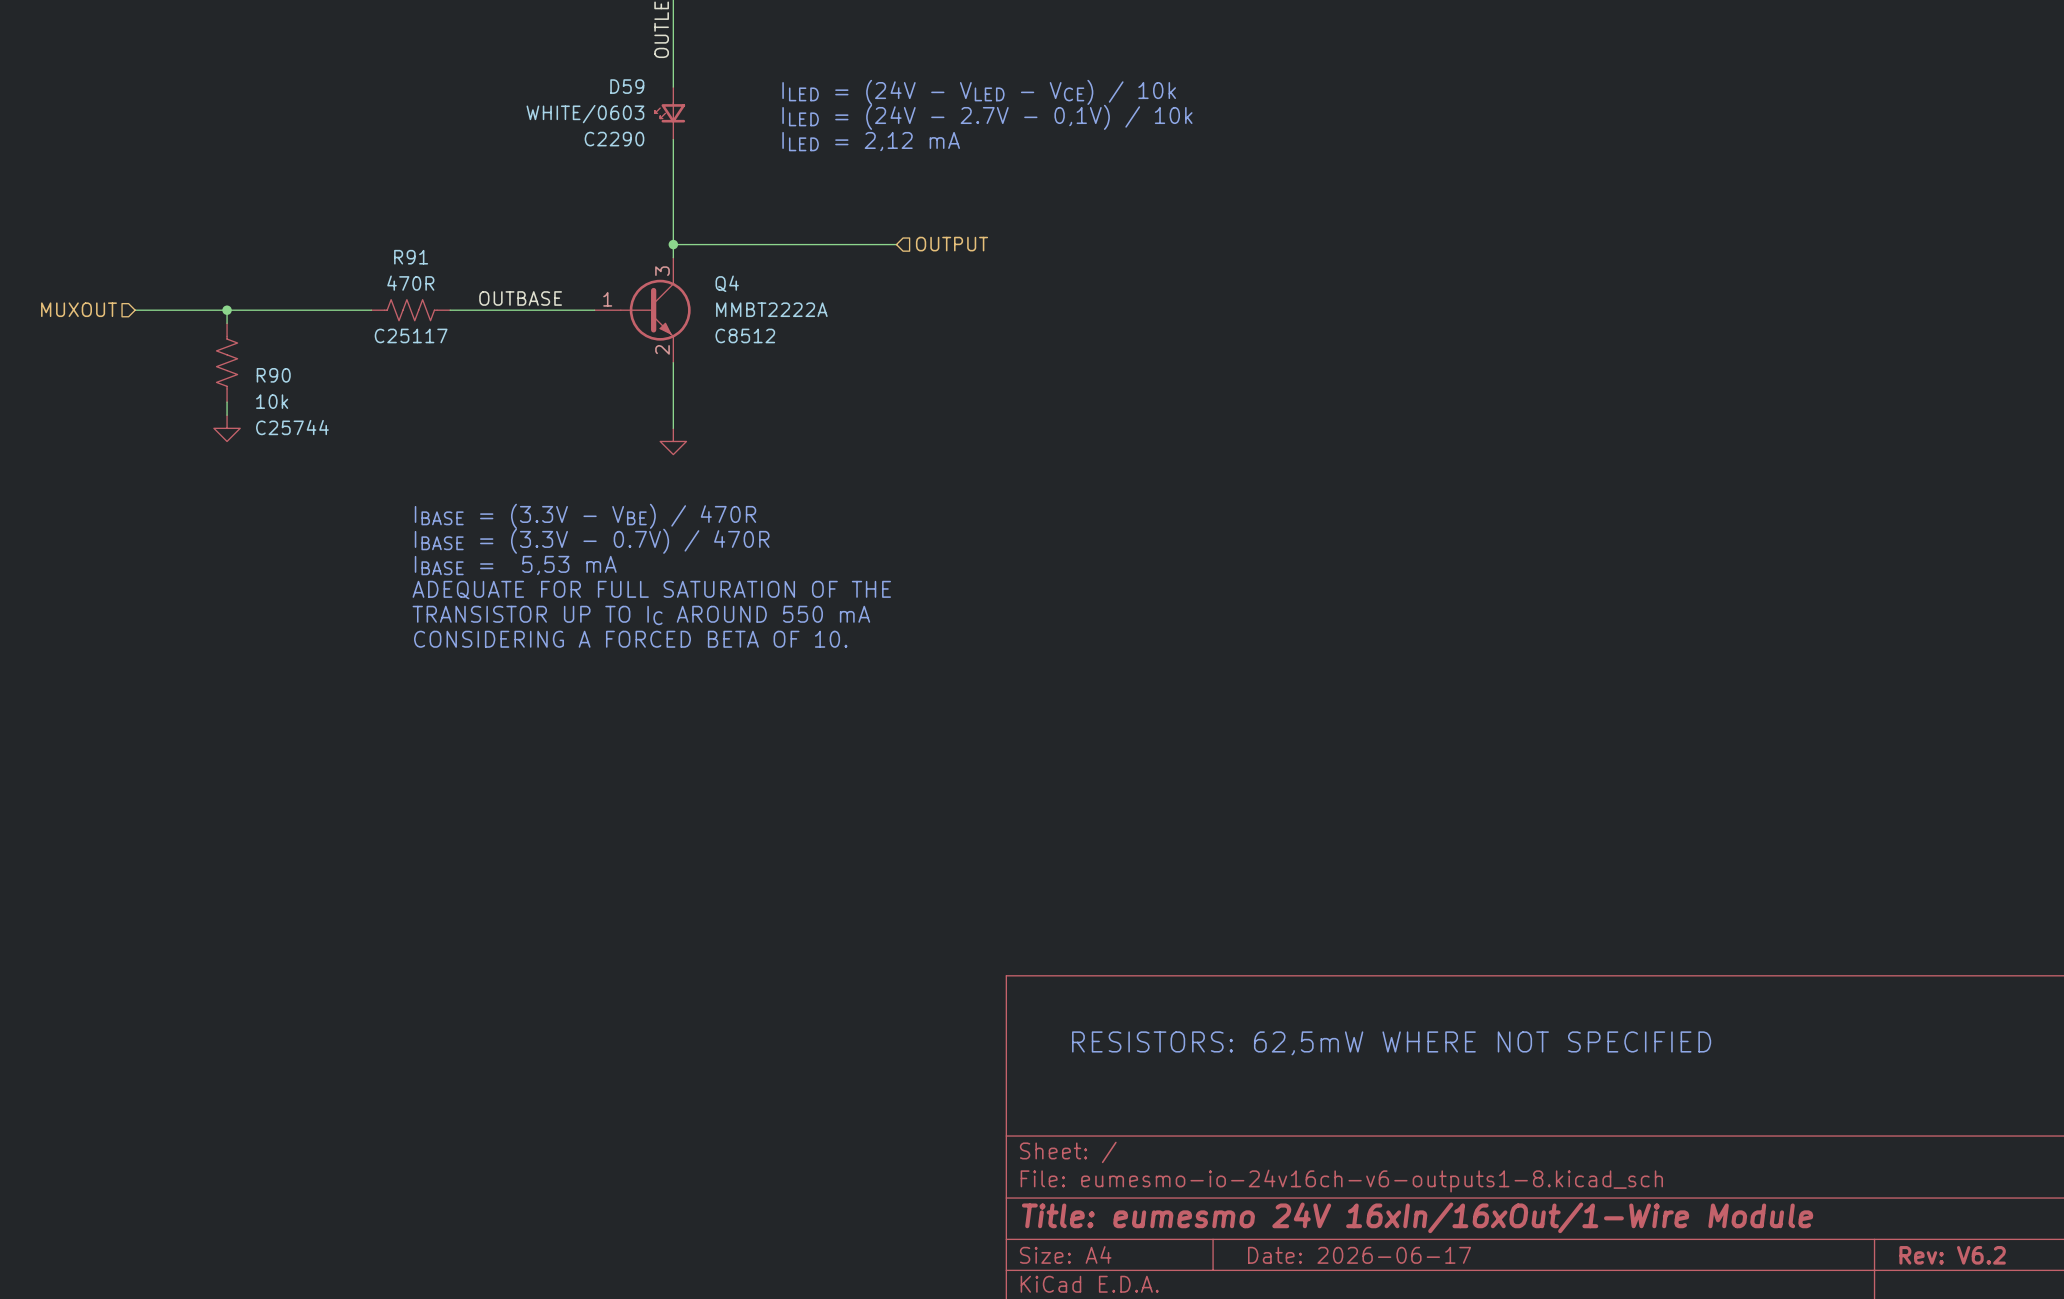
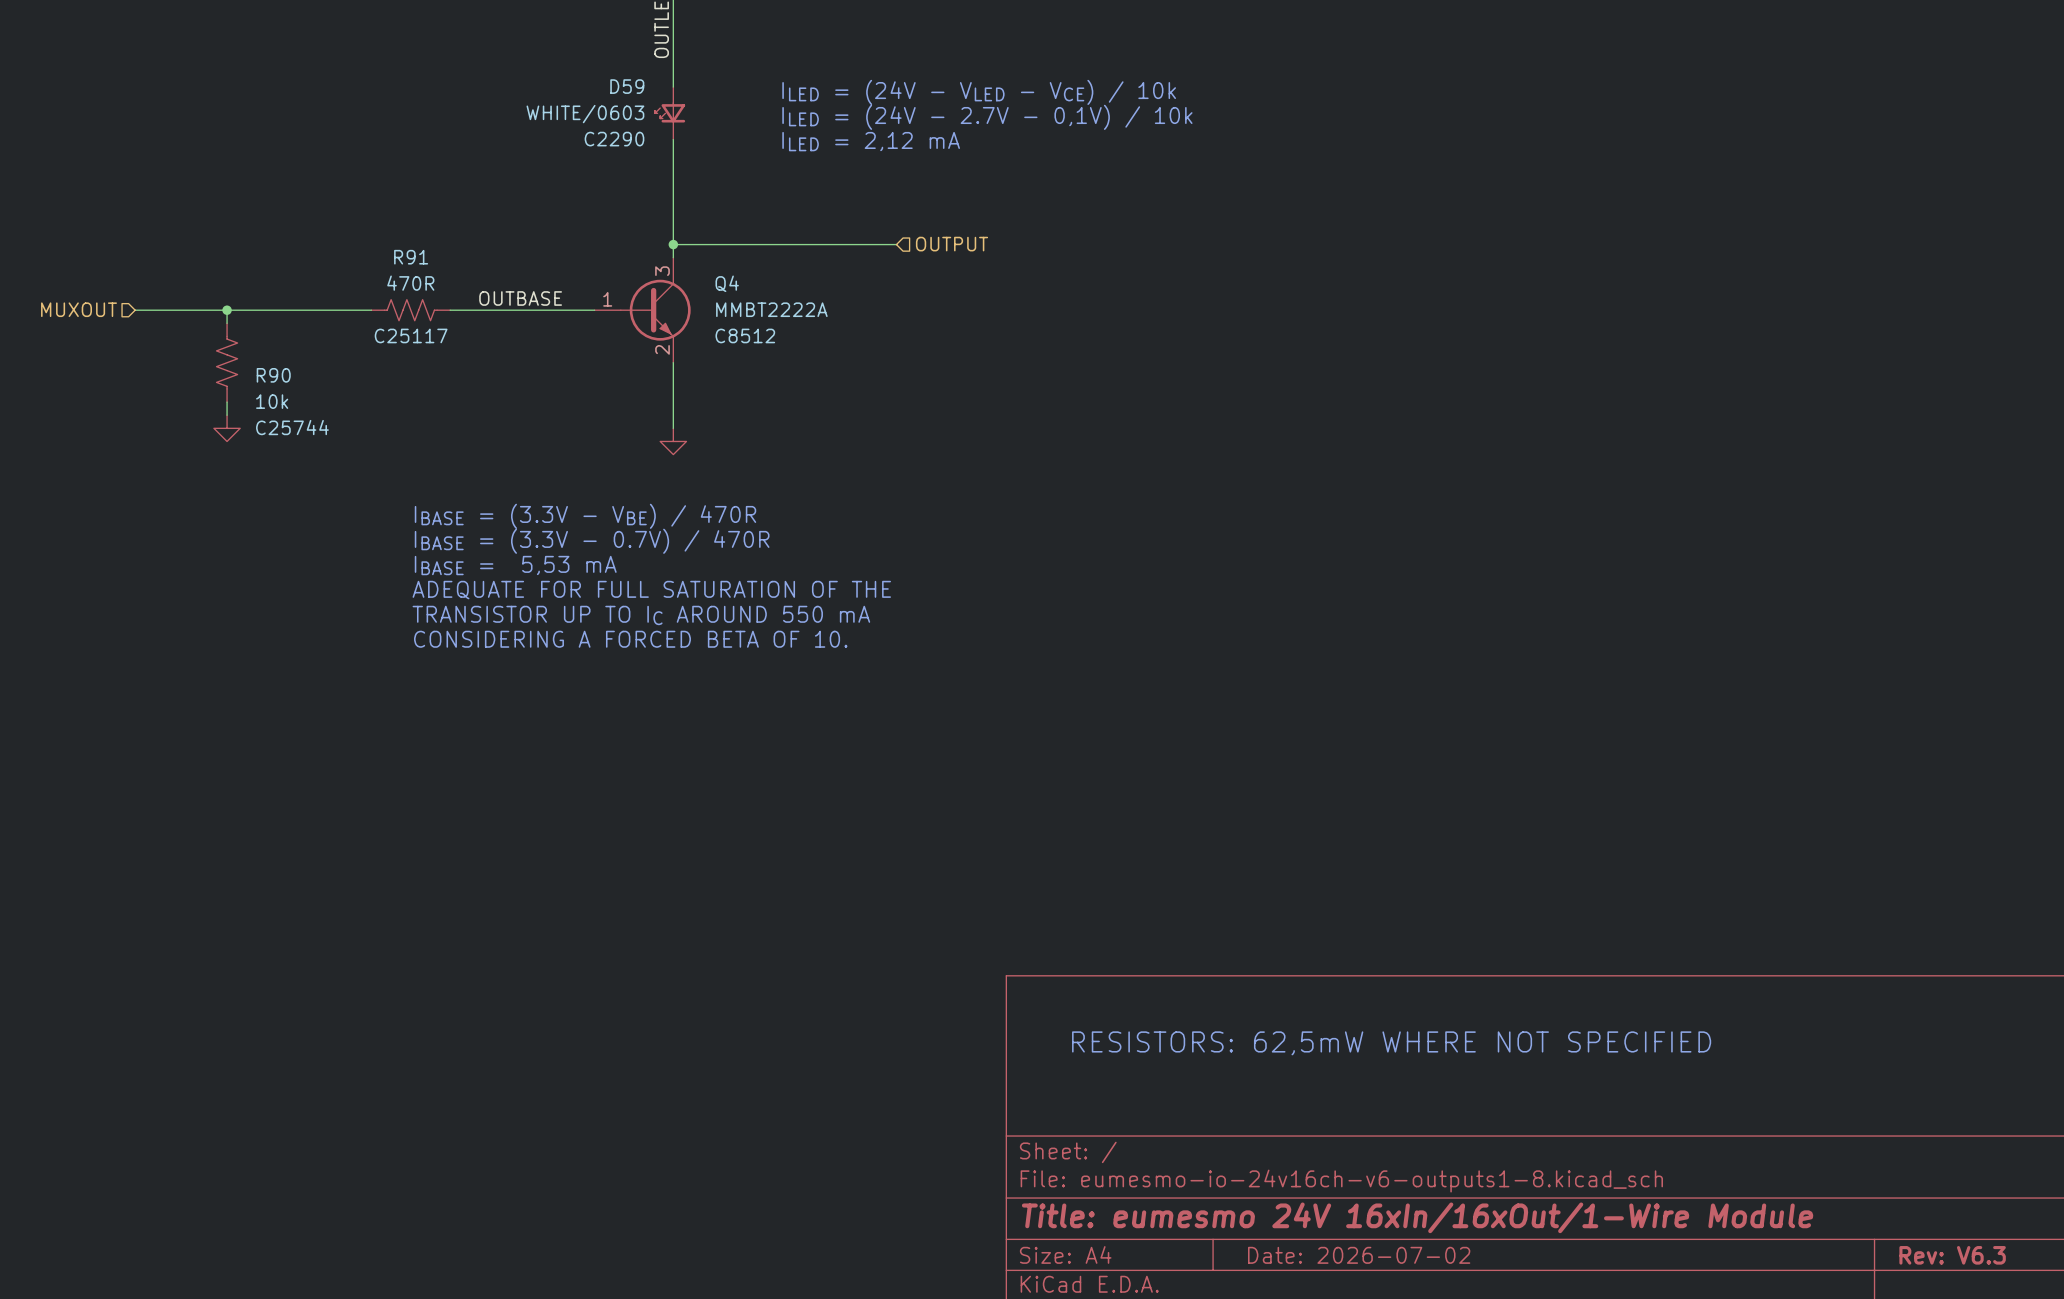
title block: Date: 2026-06-17 (1359, 1255) -> Date: 2026-07-02 (1359, 1255)
title block: Rev: V6.2 (1952, 1255) -> Rev: V6.3 (1952, 1255)

